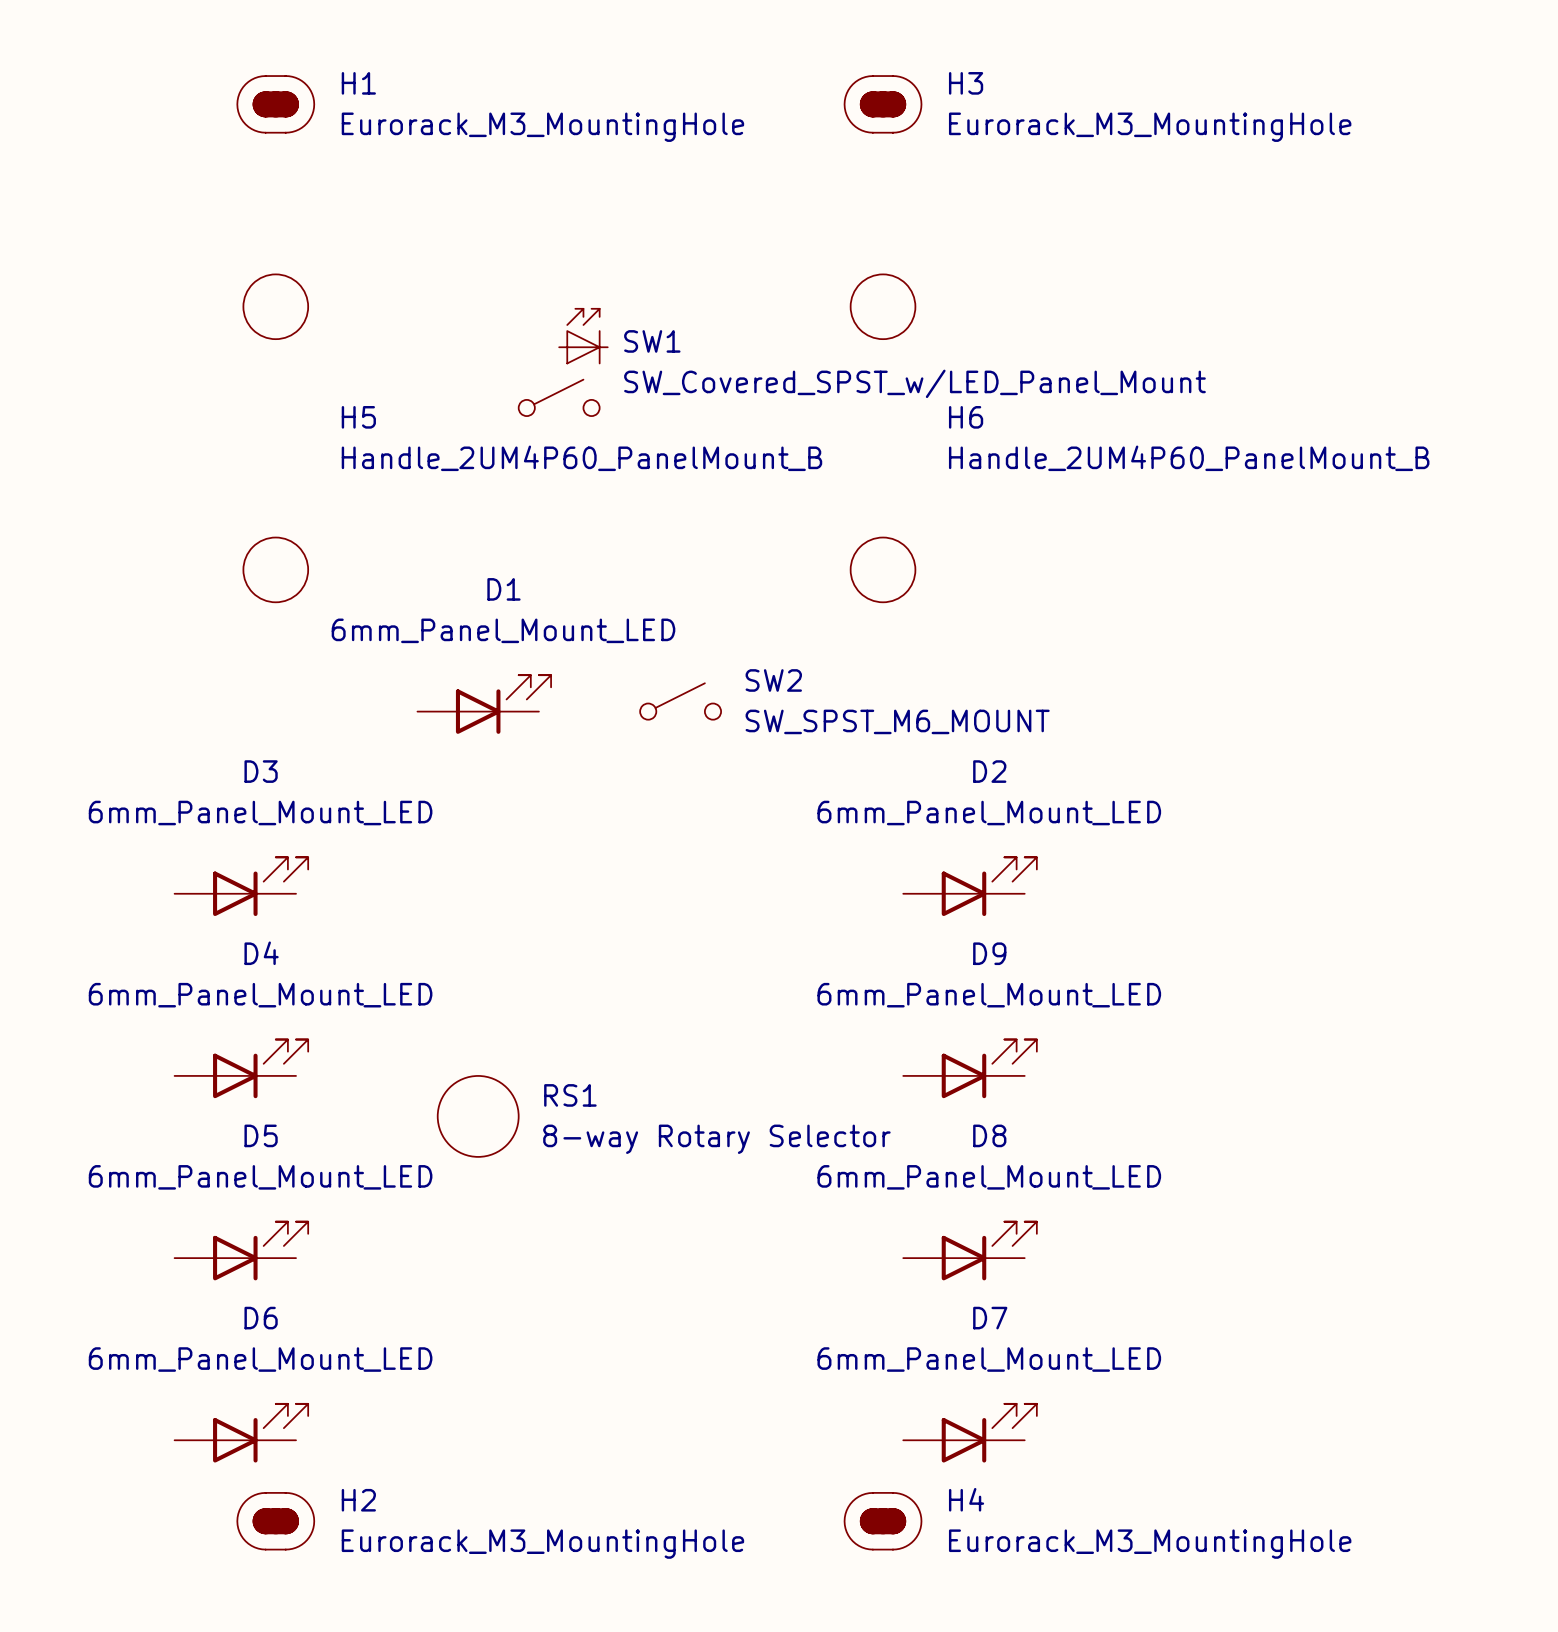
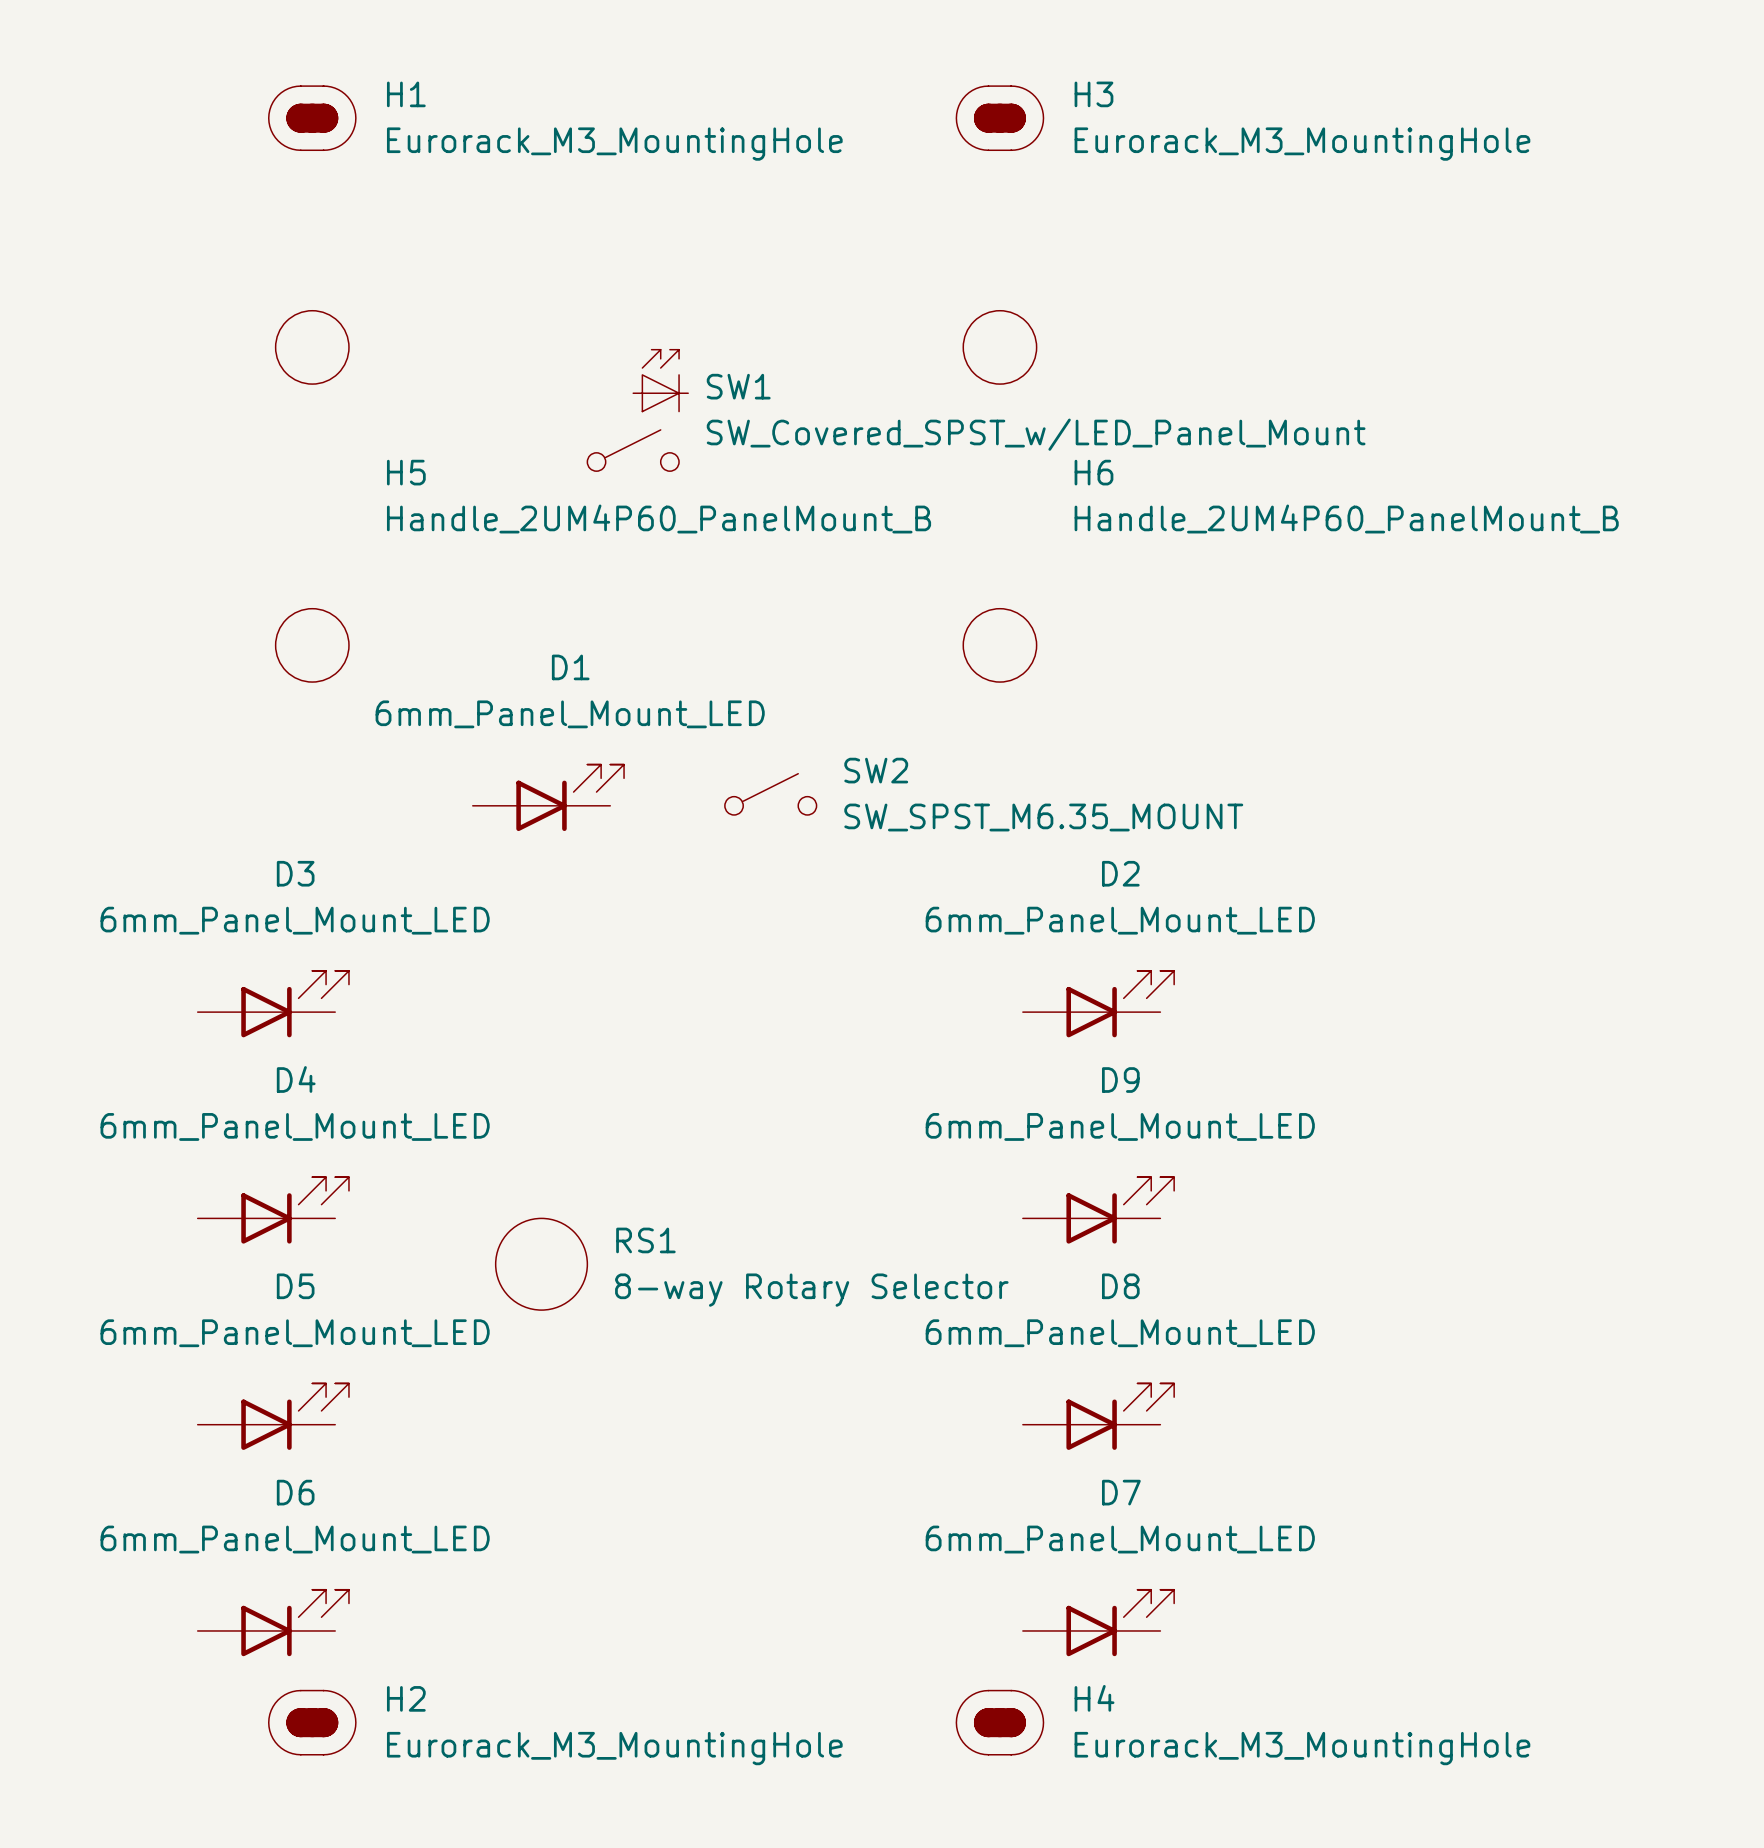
SW2 value: SW_SPST_M6_MOUNT (897, 721) -> SW_SPST_M6.35_MOUNT (1043, 817)

